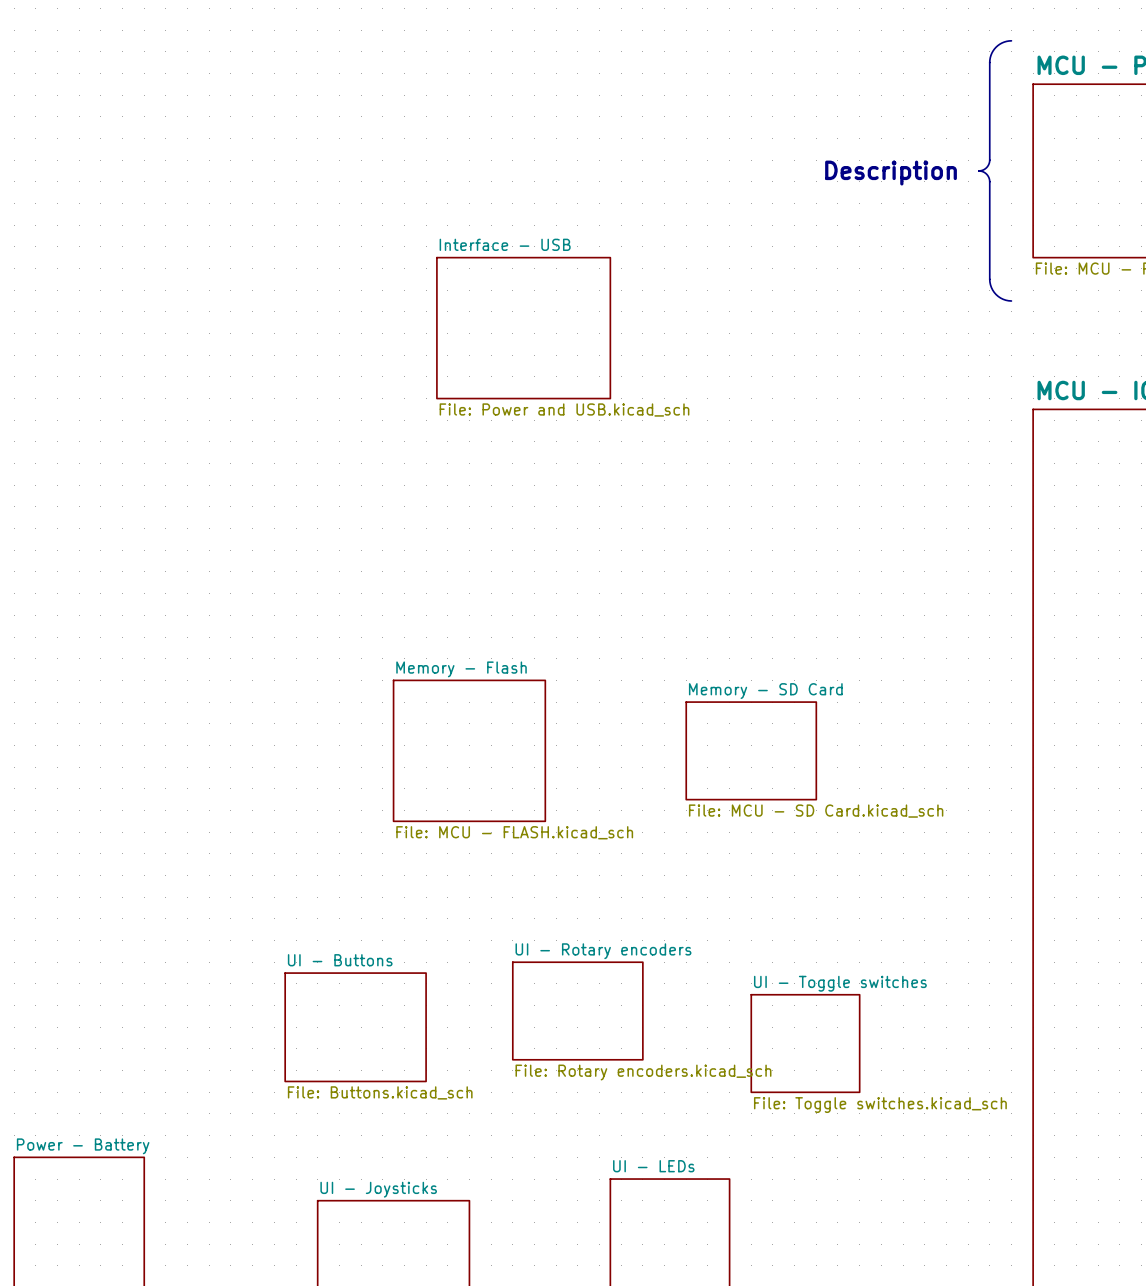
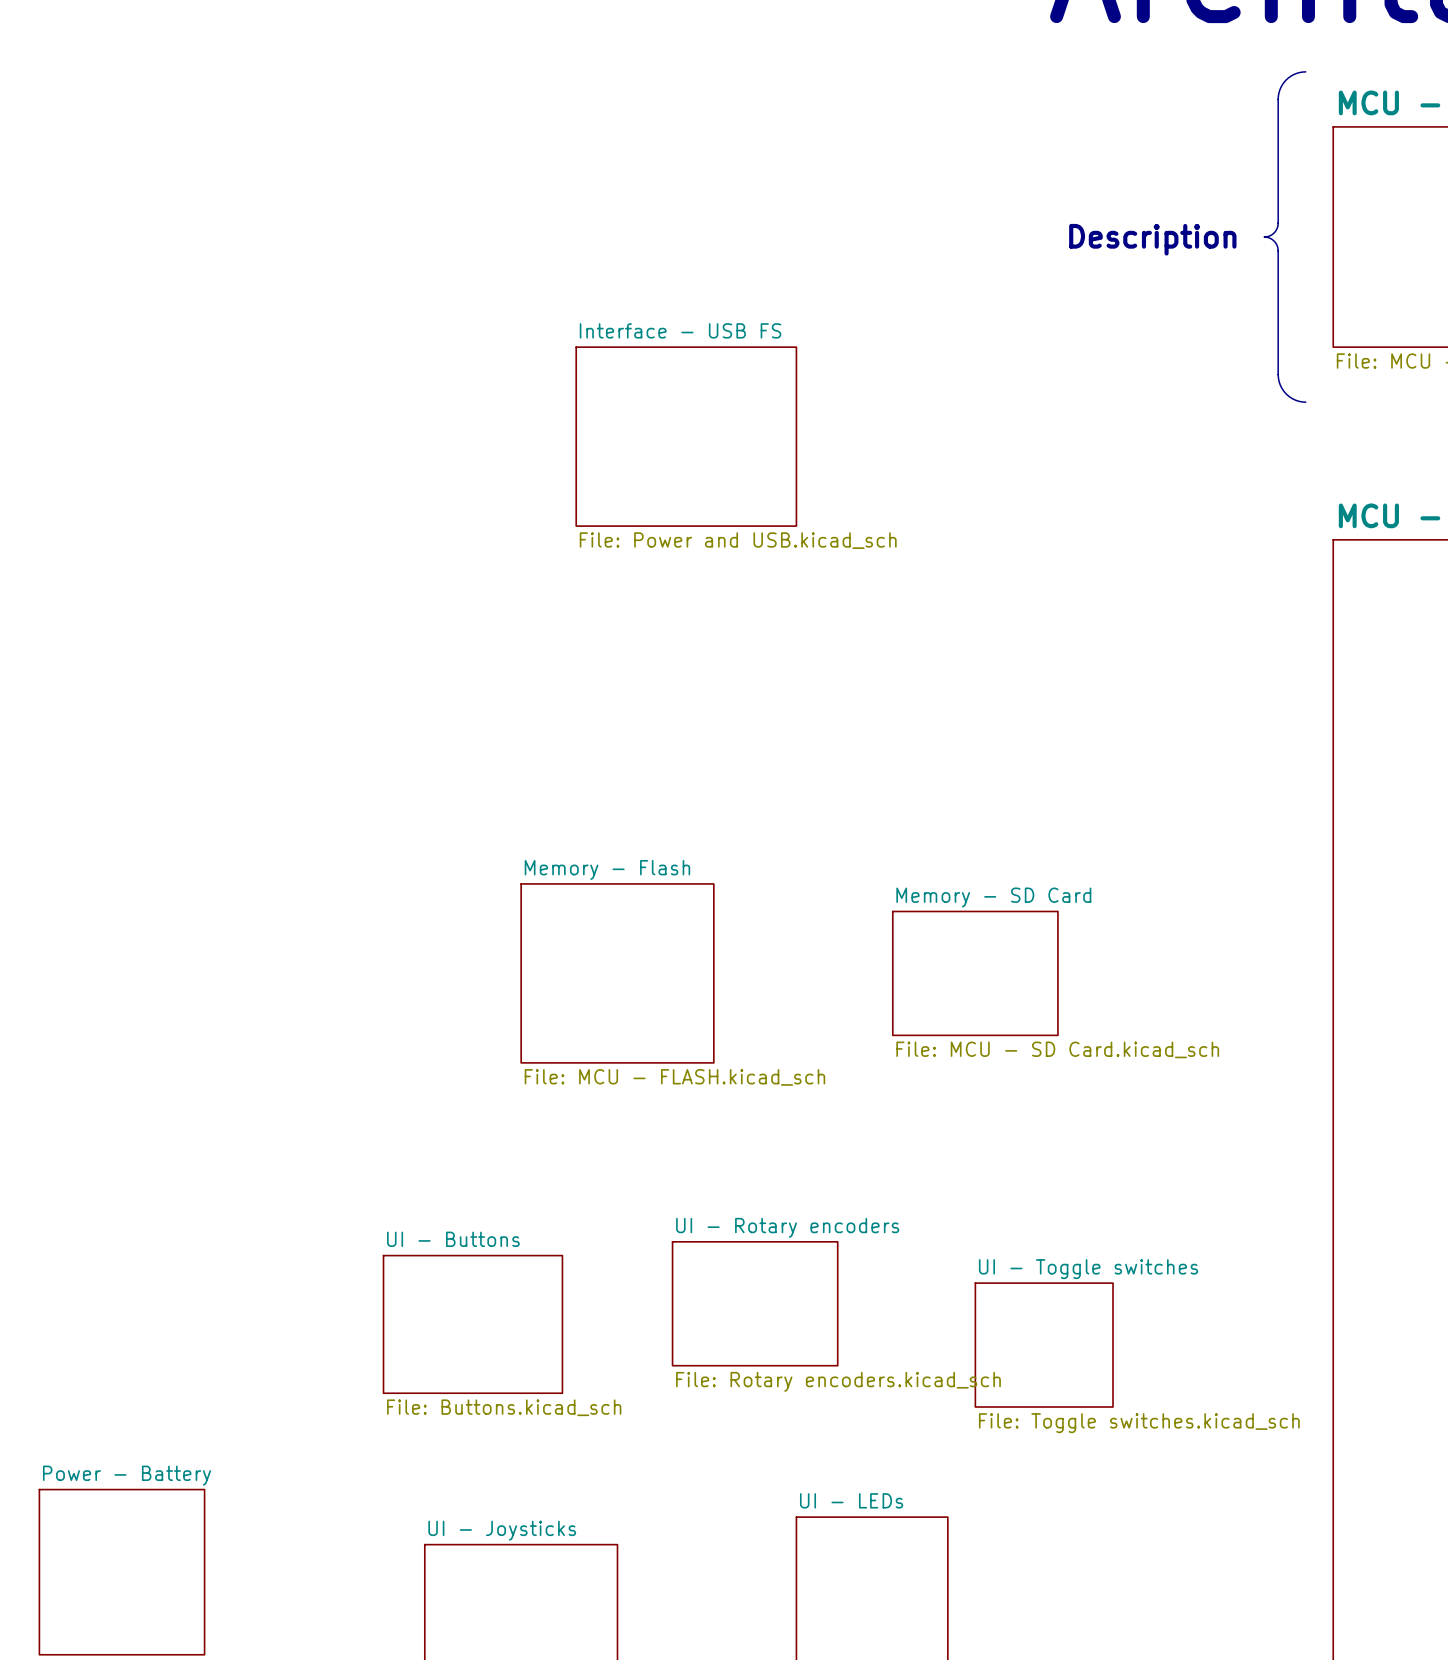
sheet Interface - USB name: Interface - USB (505, 244) -> Interface - USB FS (680, 330)

